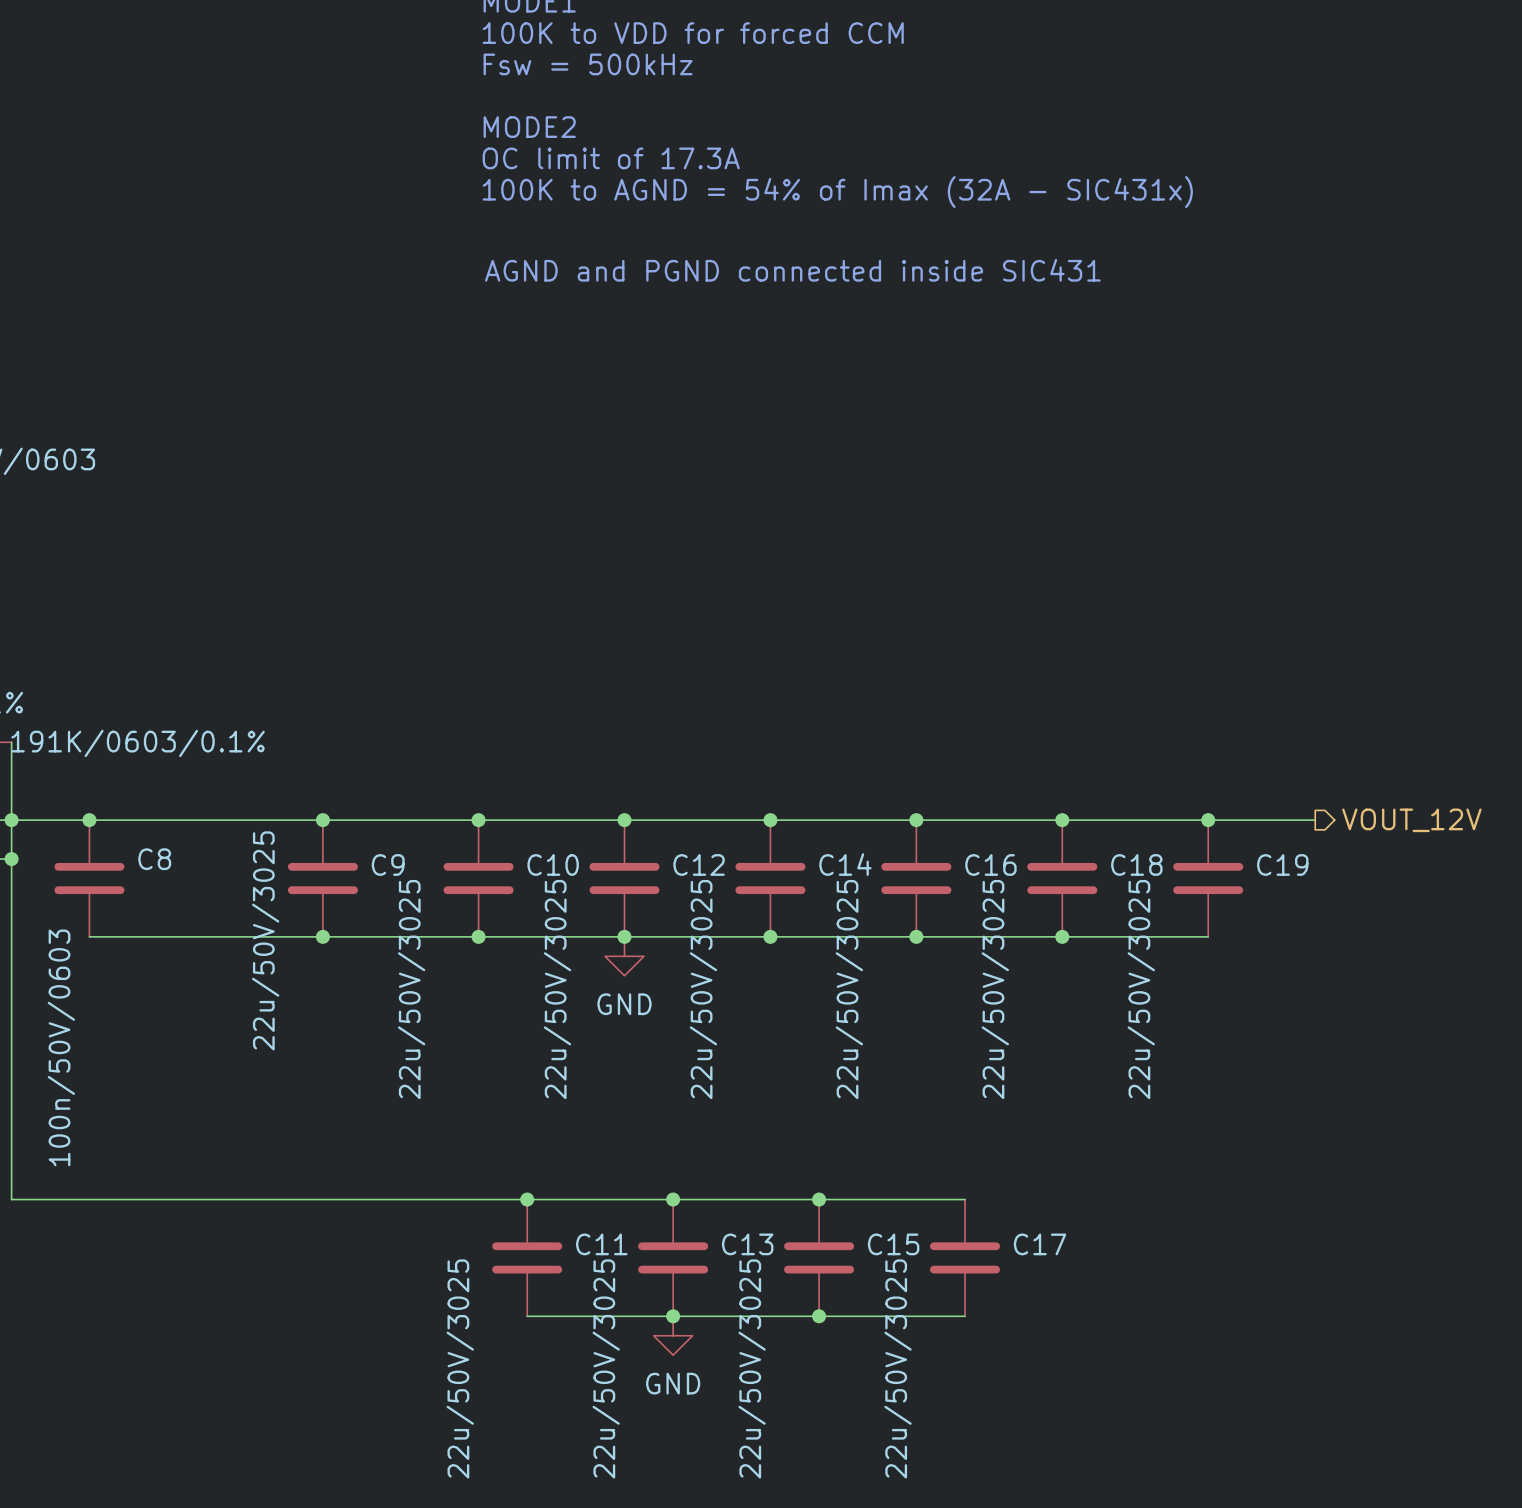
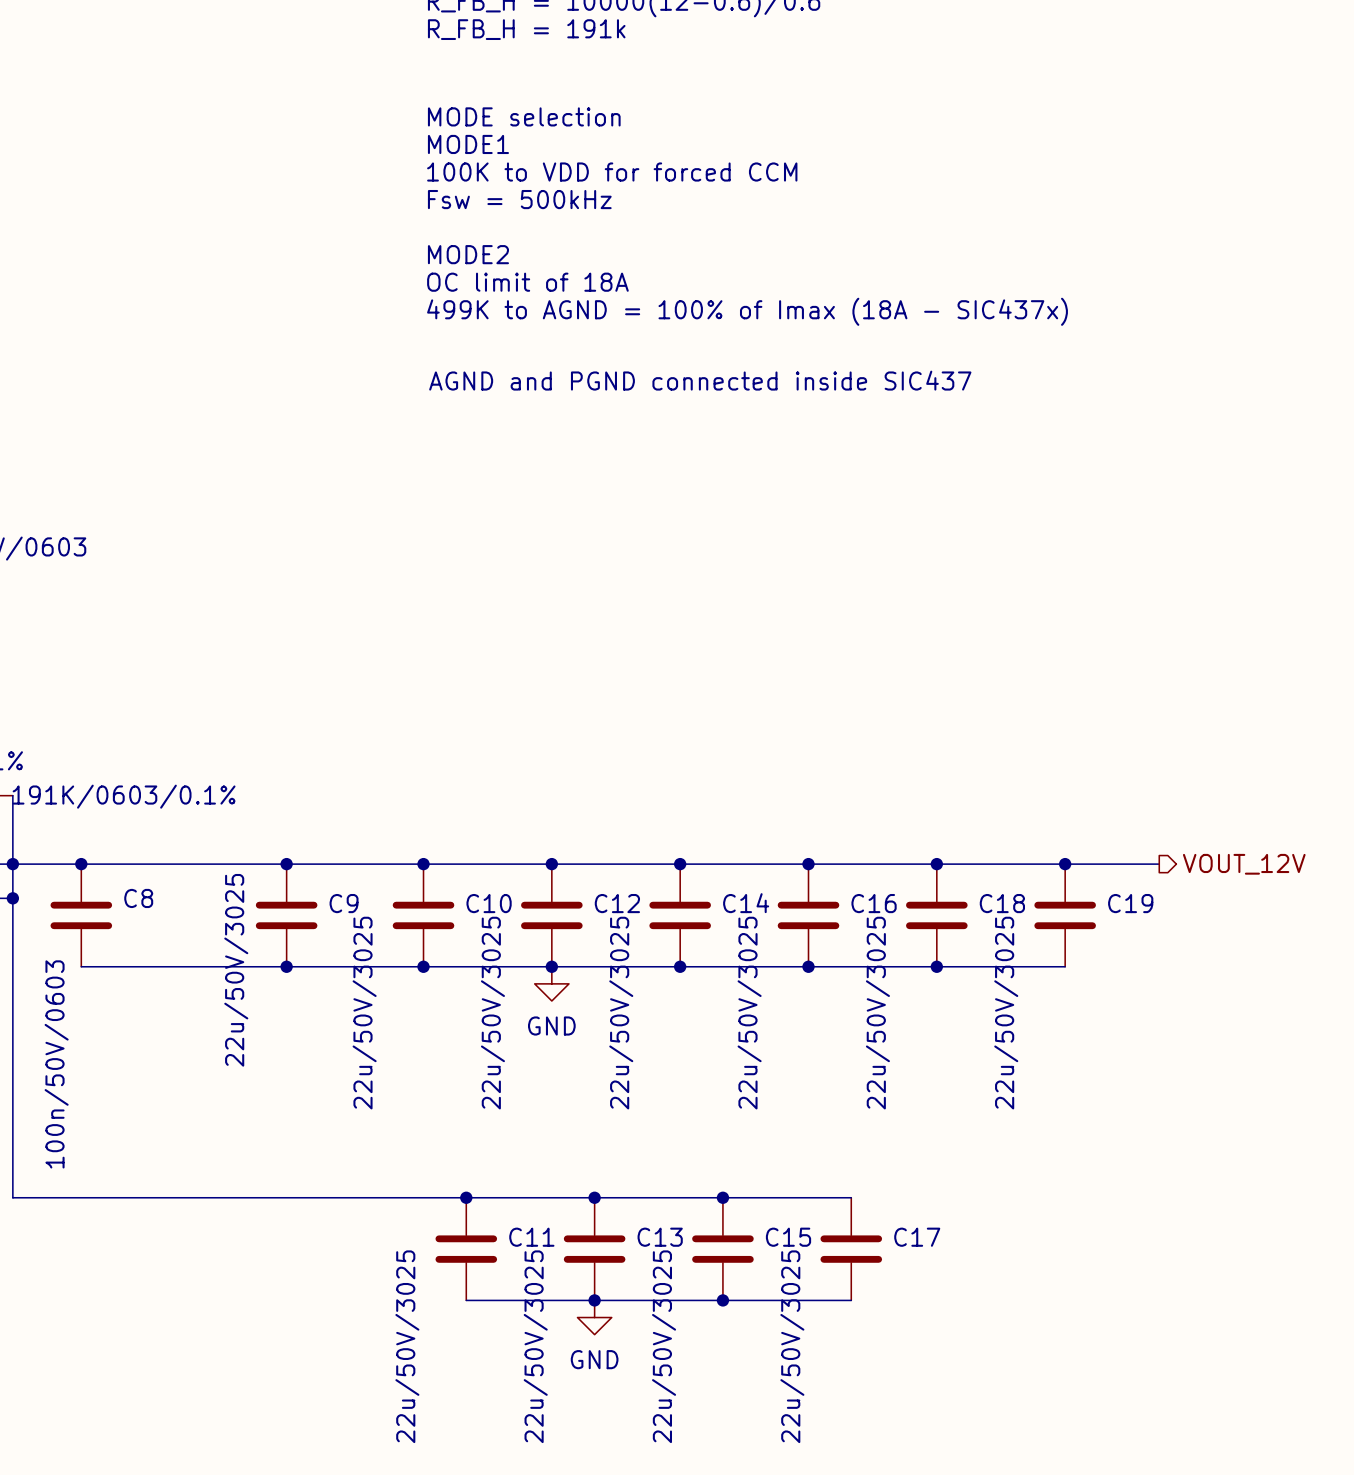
text: OC limit of 17.3A (611, 158) -> OC limit of 18A (527, 282)
text: 100K to AGND = 54% of Imax (32A - SIC431x) (837, 192) -> 499K to AGND = 100% of Imax (18A - SIC437x) (747, 311)
text: AGND and PGND connected inside SIC431 (792, 270) -> AGND and PGND connected inside SIC437 (700, 380)

